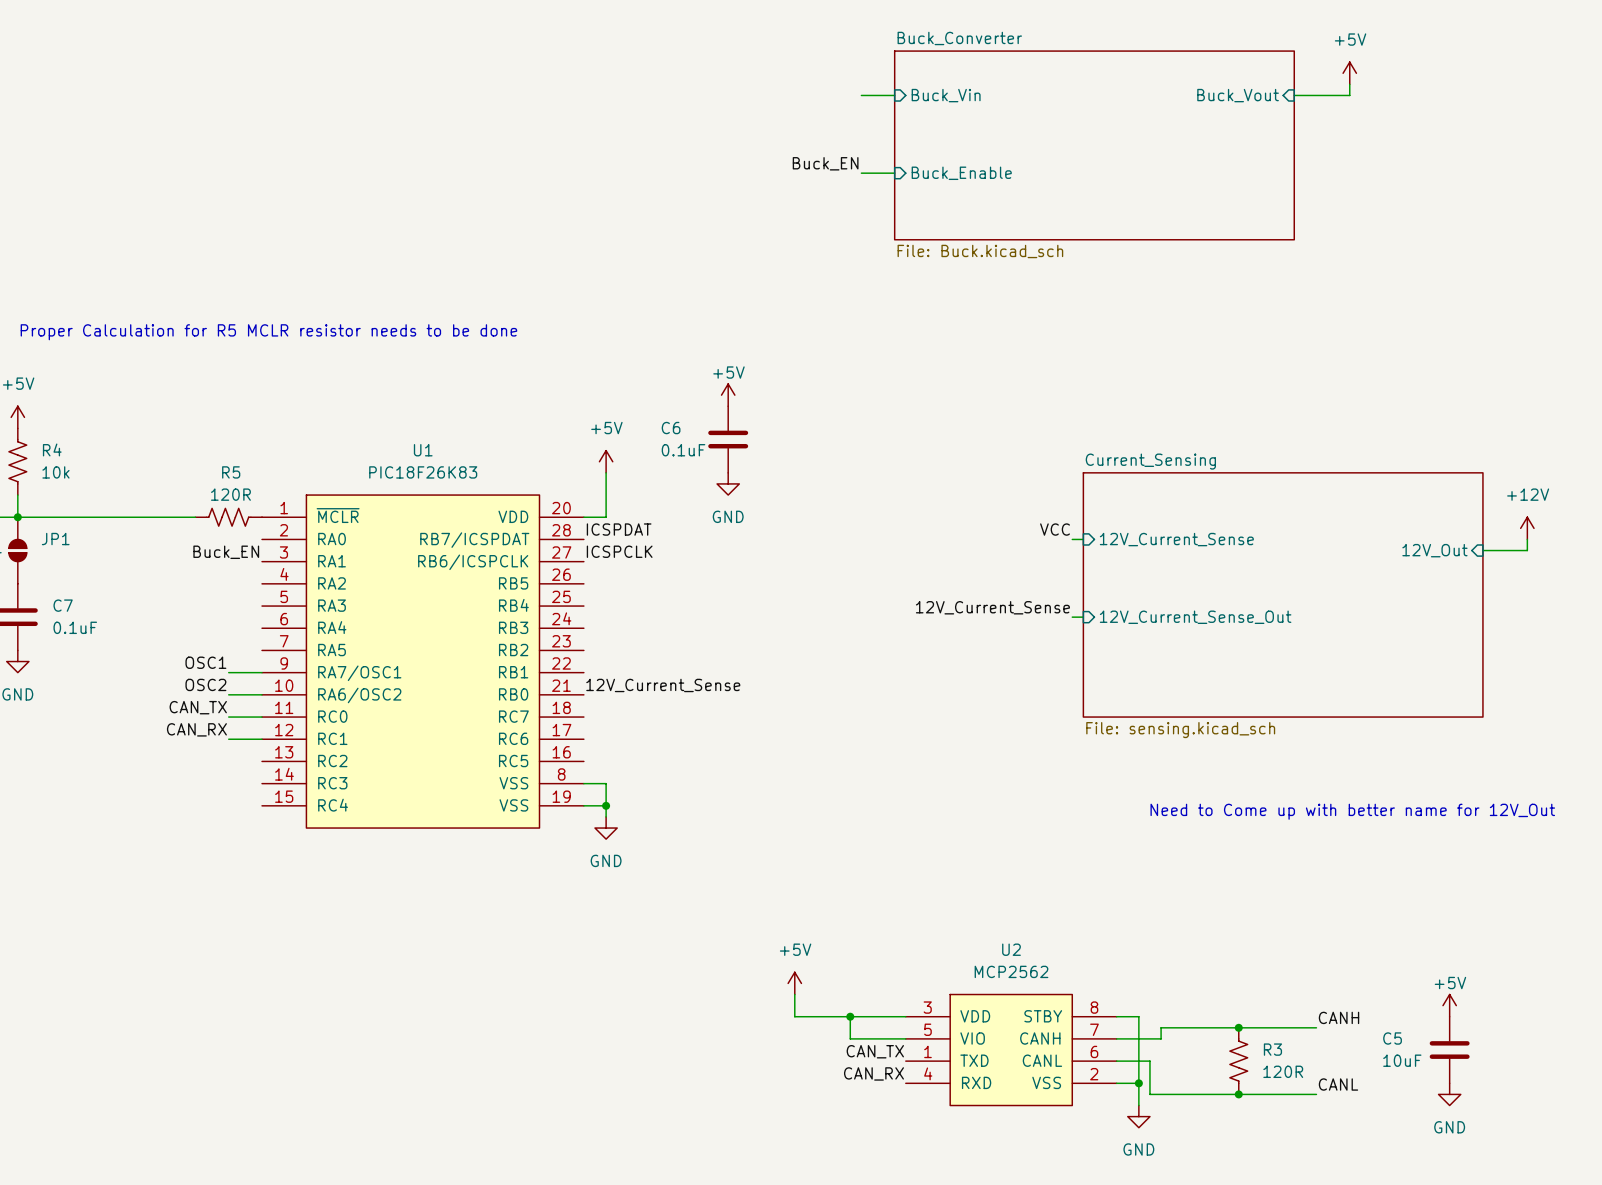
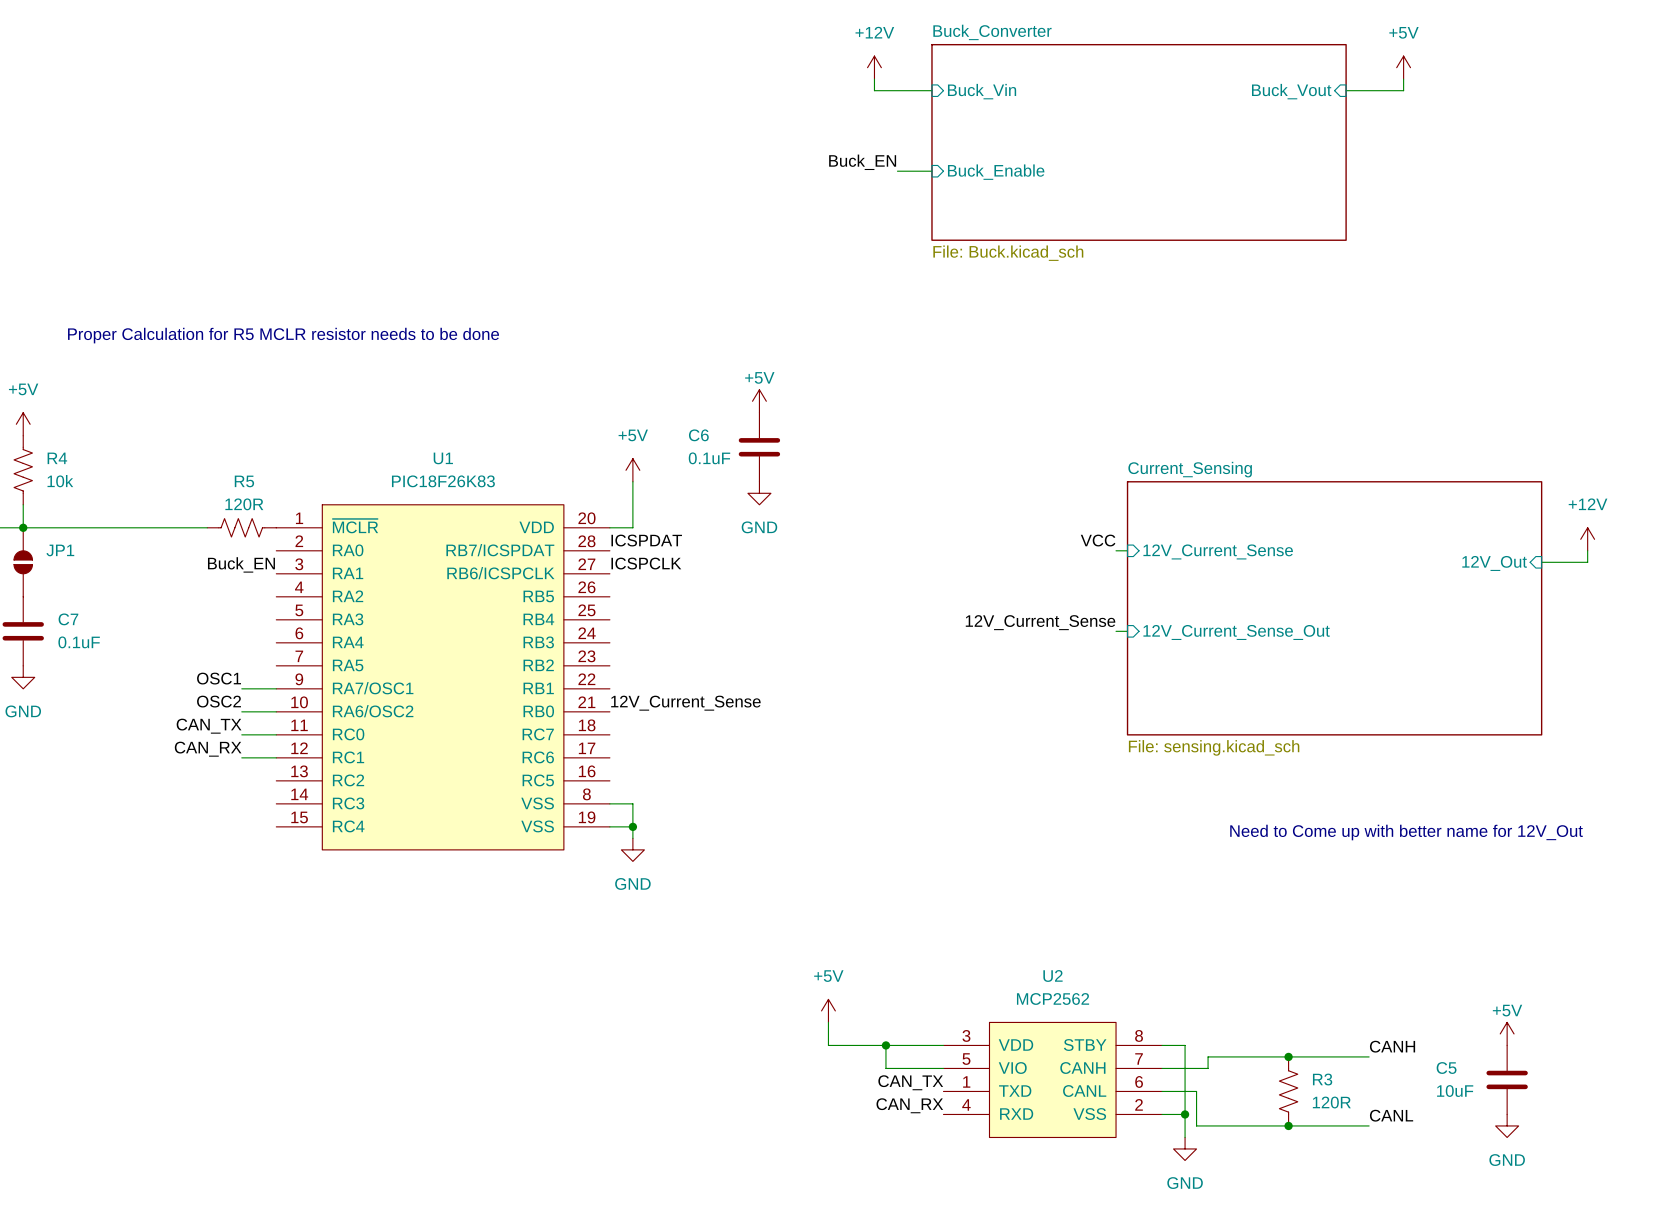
power symbol: none -> +12V (874, 67)
wire: none -> (874, 79) (874, 90) (897, 90)

